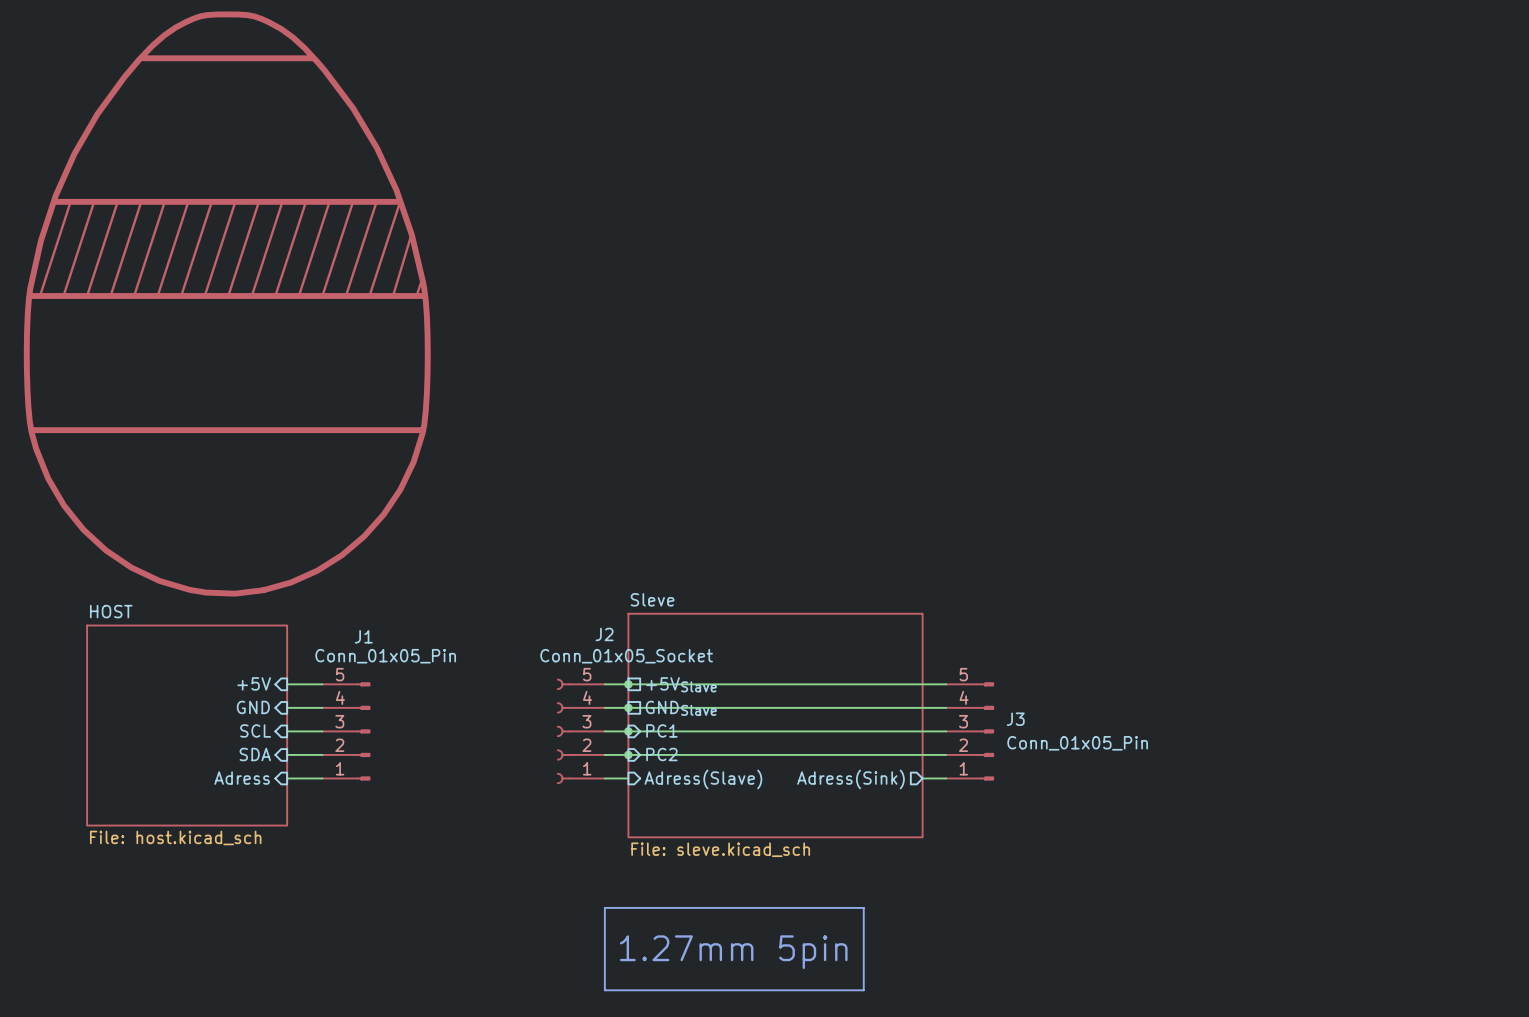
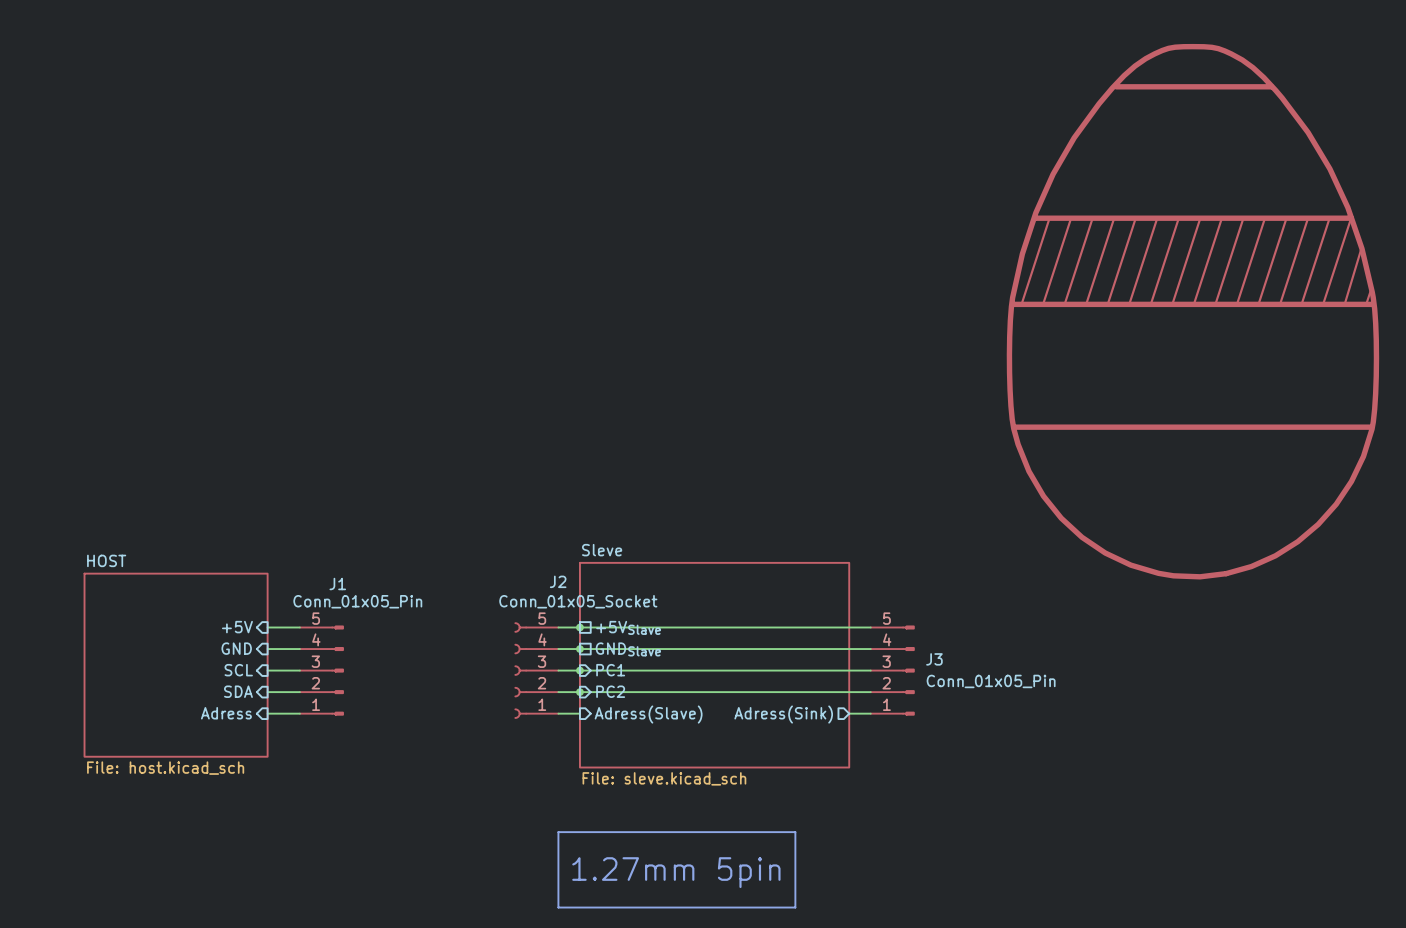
part: (227, 304) -> none
part: none -> (1192, 311)

